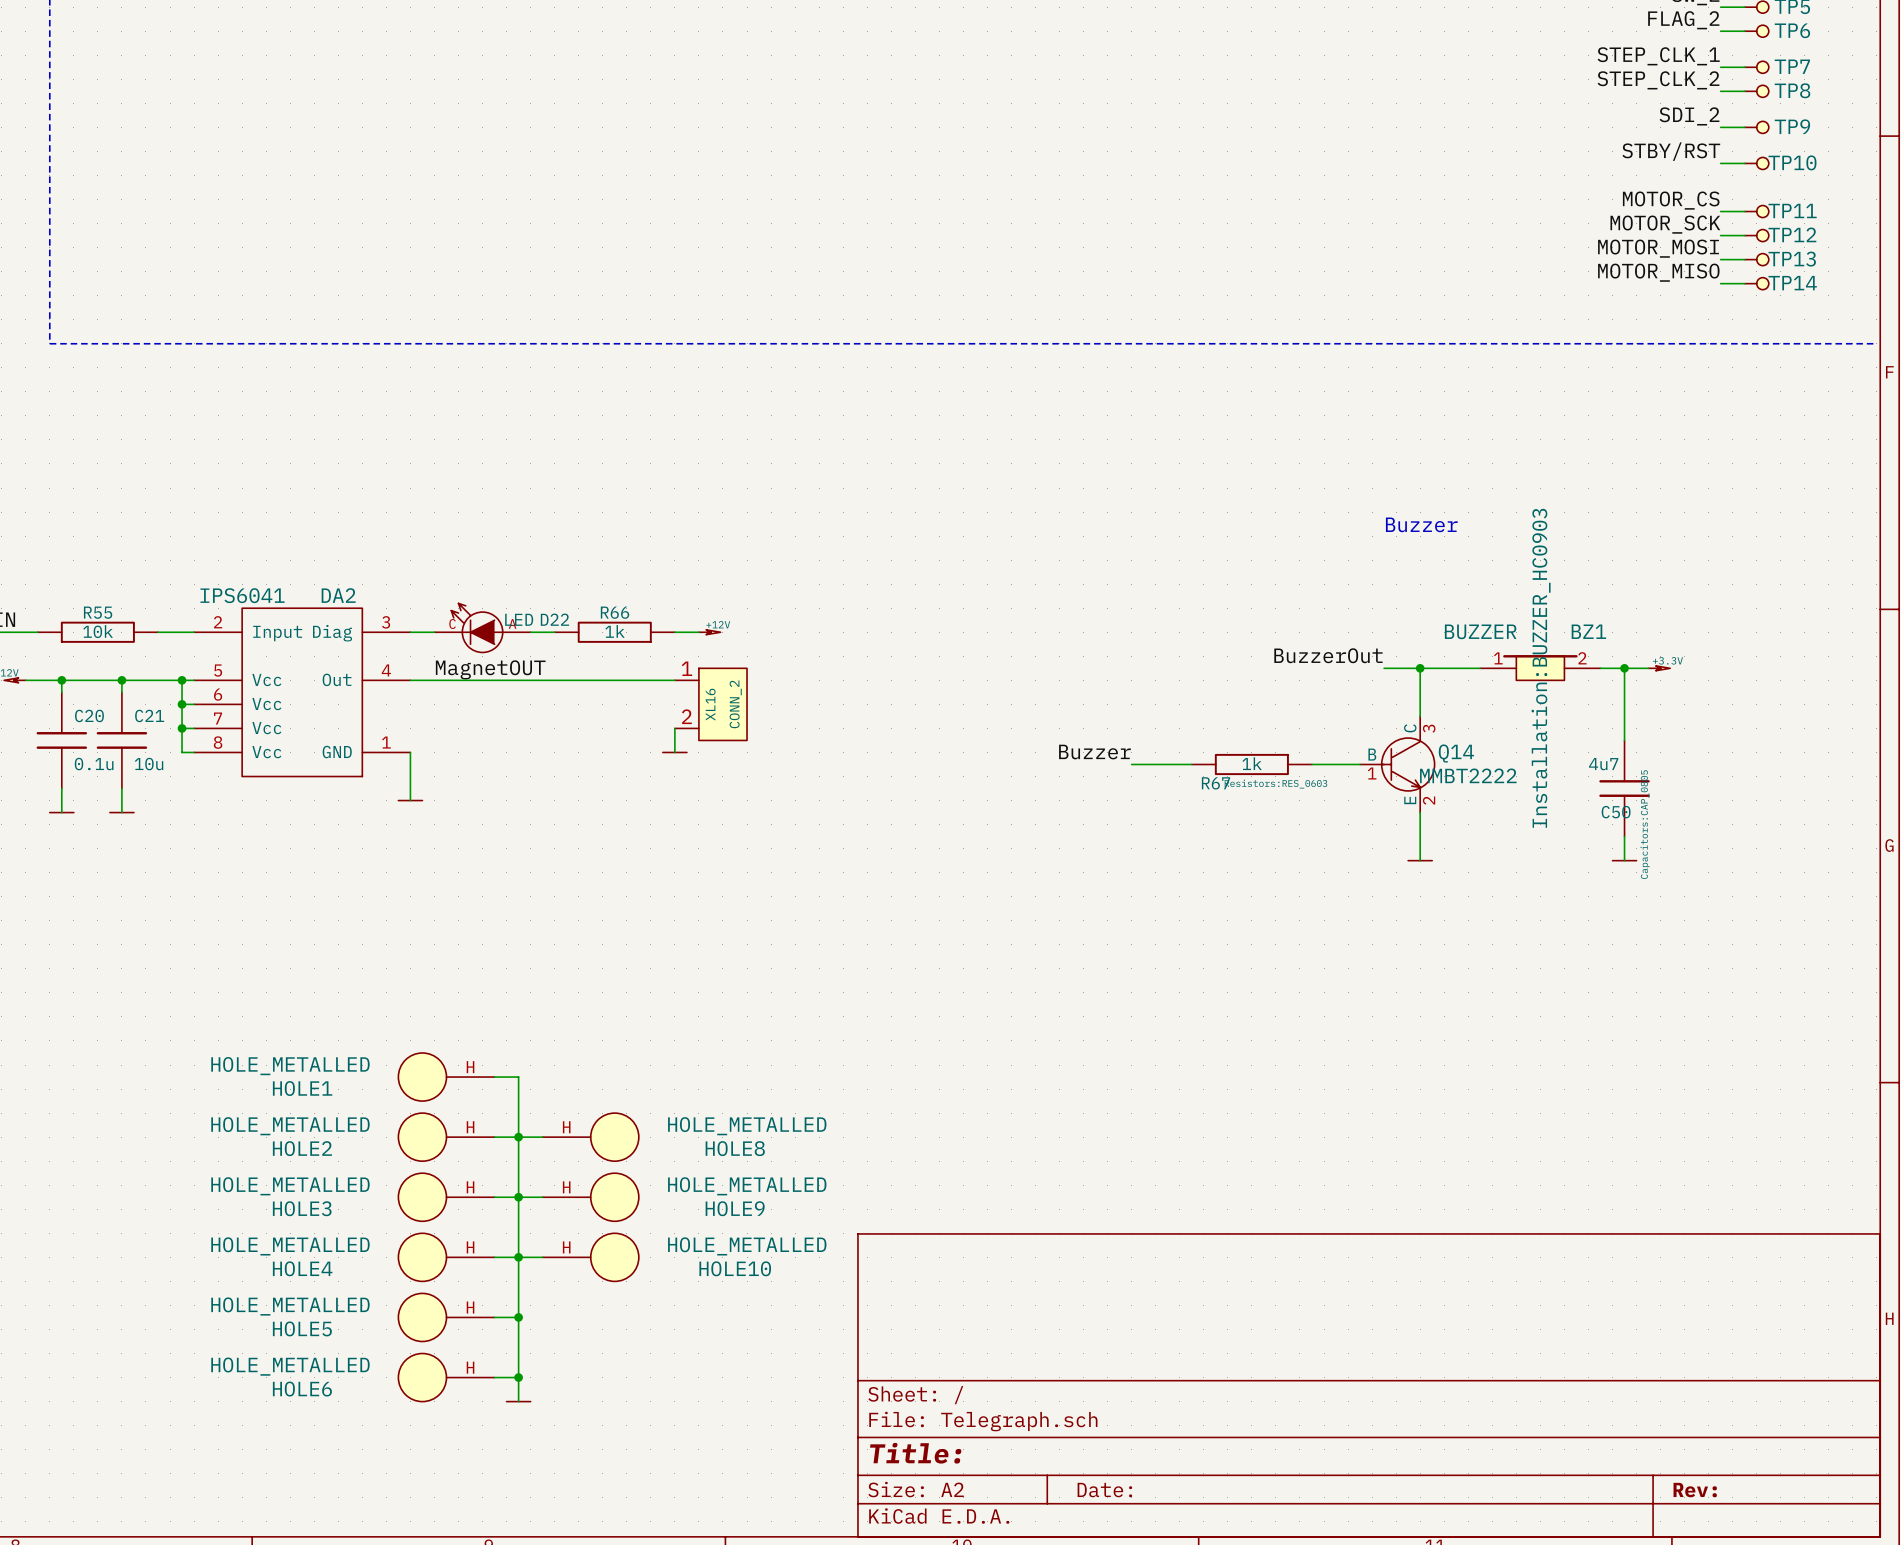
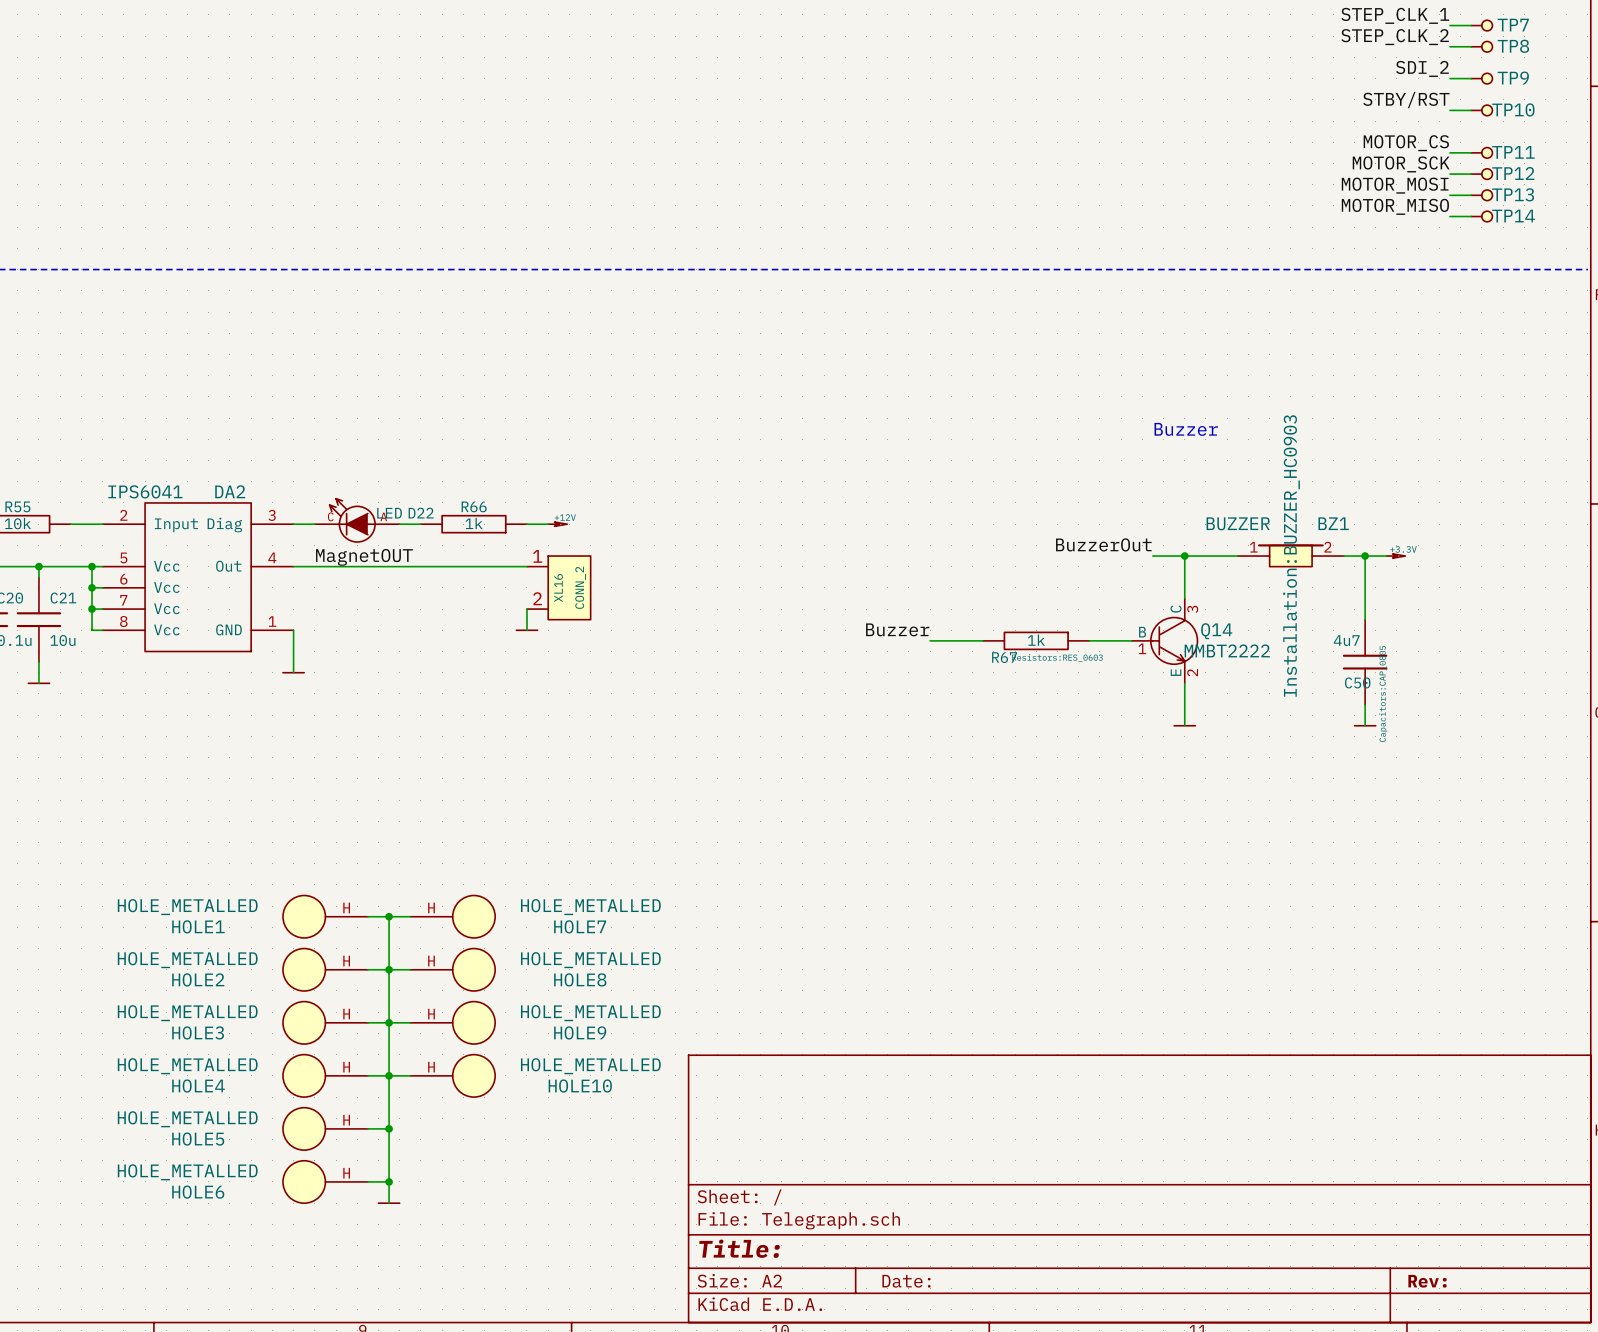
wire: none -> (389, 916) (410, 916)
junction: none -> (389, 916)
HOLE7: none -> HOLE_METALLED (452, 916)

